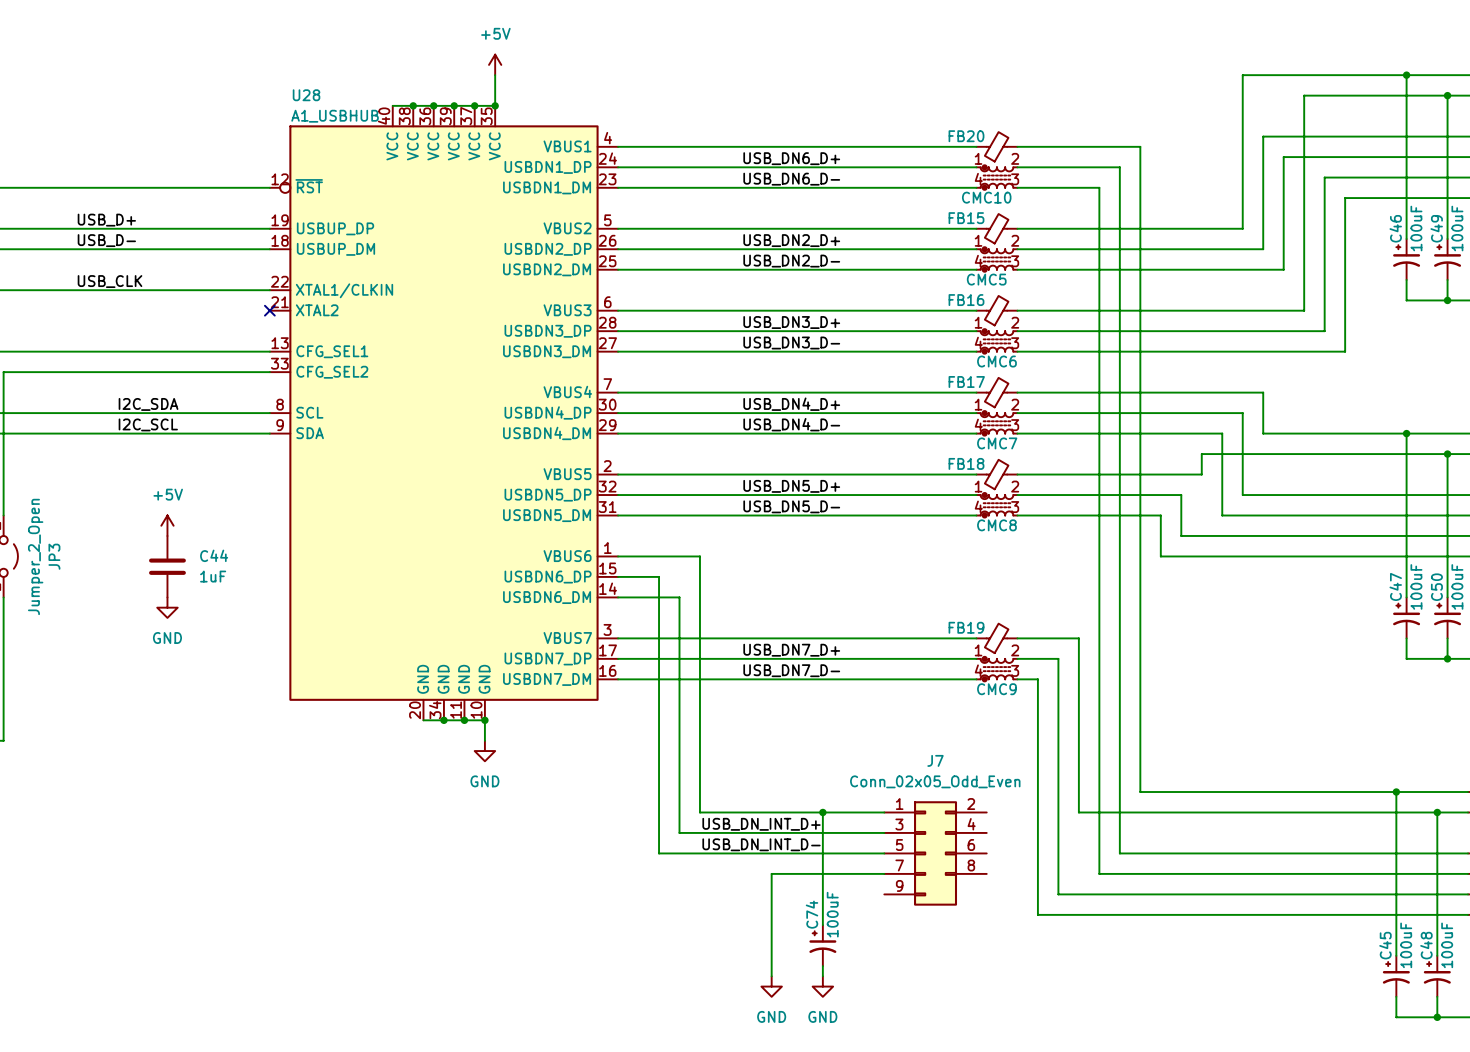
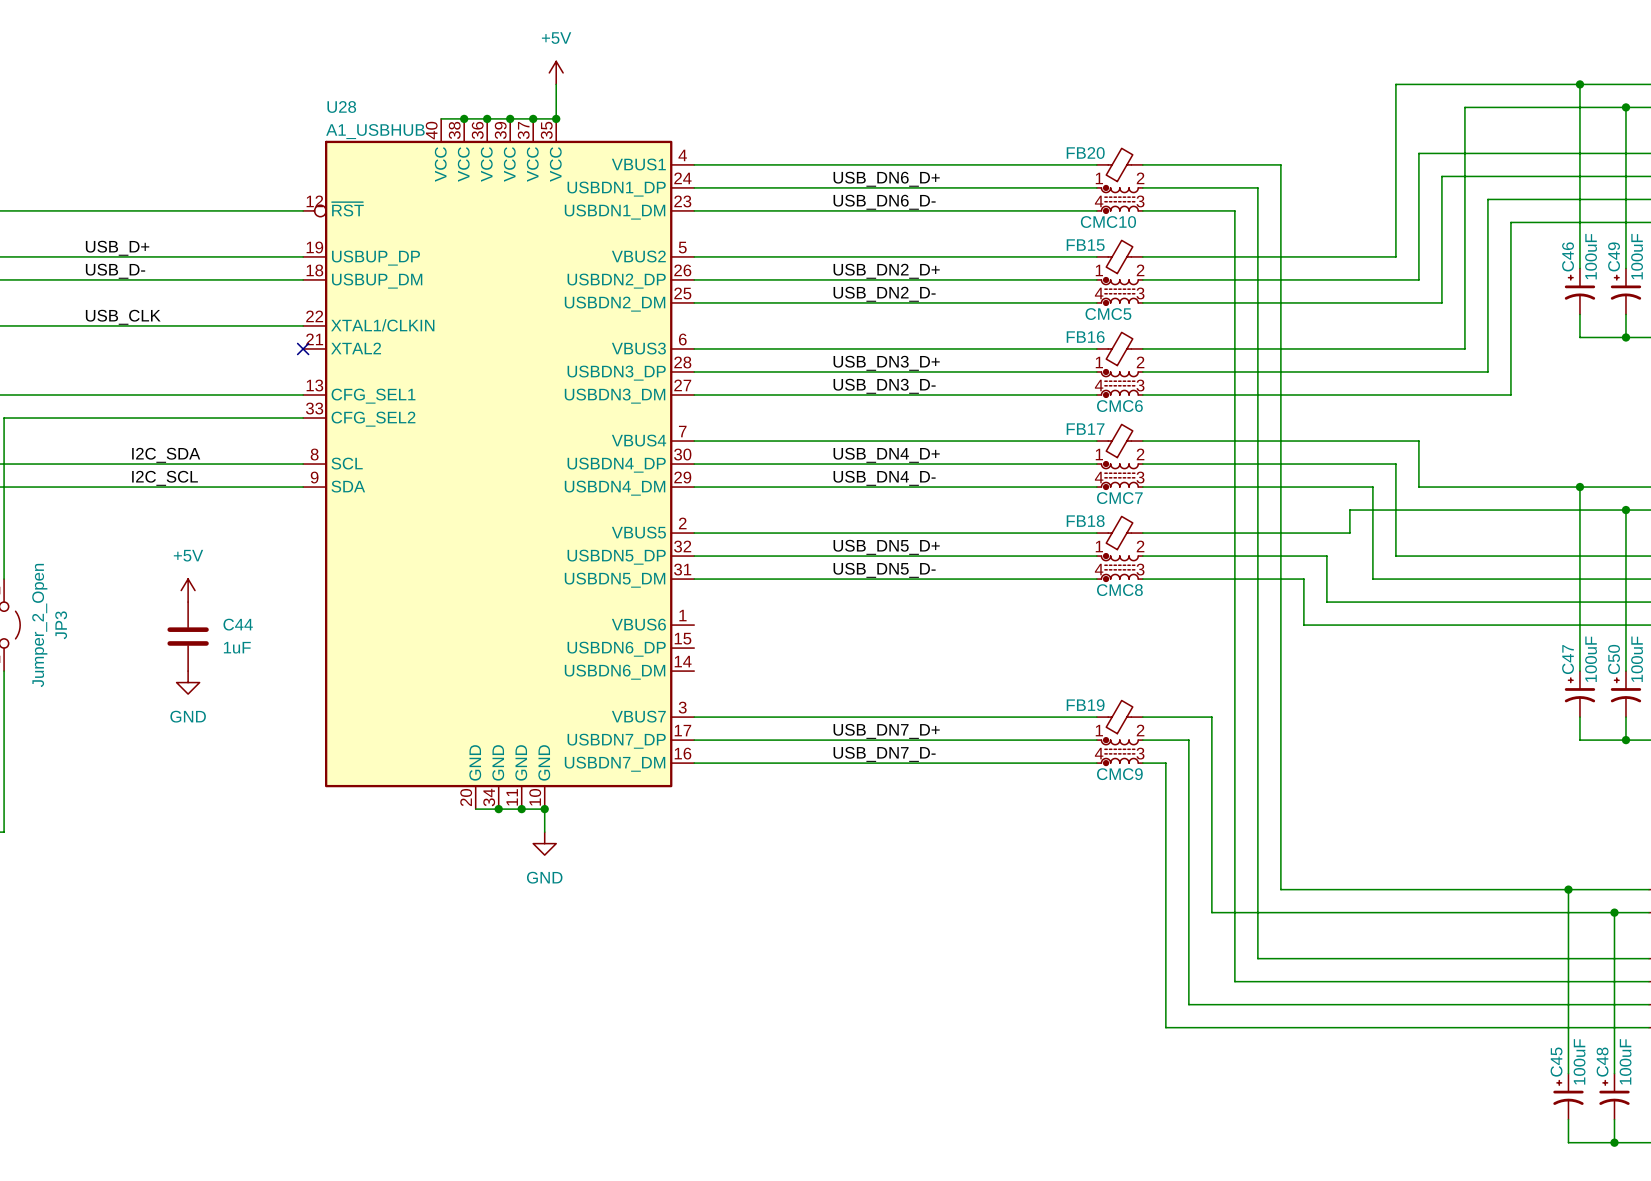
wire: (618, 556) (699, 556) (699, 812) (884, 812) -> none
wire: (618, 576) (659, 576) (659, 853) (884, 853) -> none
wire: (618, 597) (679, 597) (679, 832) (884, 832) -> none
wire: (822, 812) (822, 925) -> none
junction: (822, 812) -> none
label: USB_DN_INT_D+ (761, 824) -> none
label: USB_DN_INT_D- (761, 844) -> none
J7: Conn_02x05_Odd_Even (935, 853) -> none
wire: (884, 873) (771, 873) (771, 976) -> none
C74: 100uF (822, 945) -> none
wire: (822, 966) (822, 976) -> none
power symbol: GND (771, 986) -> none
power symbol: GND (822, 986) -> none

